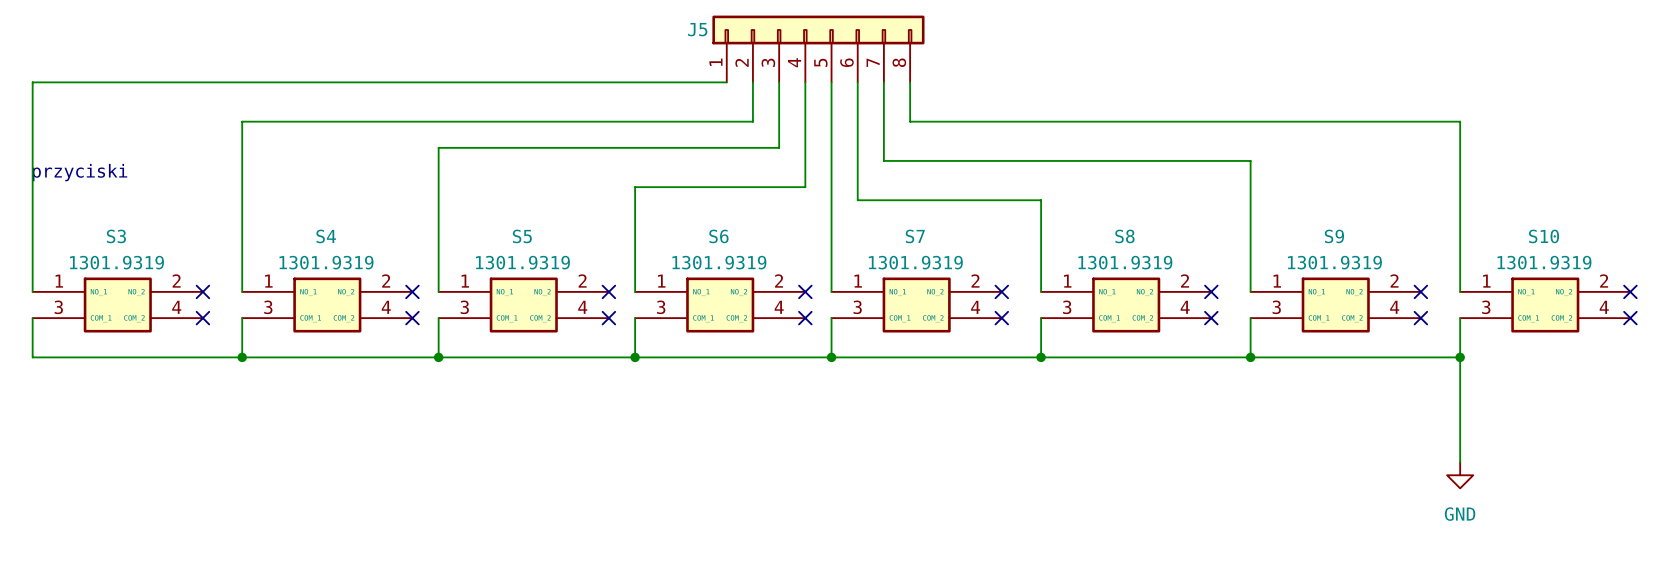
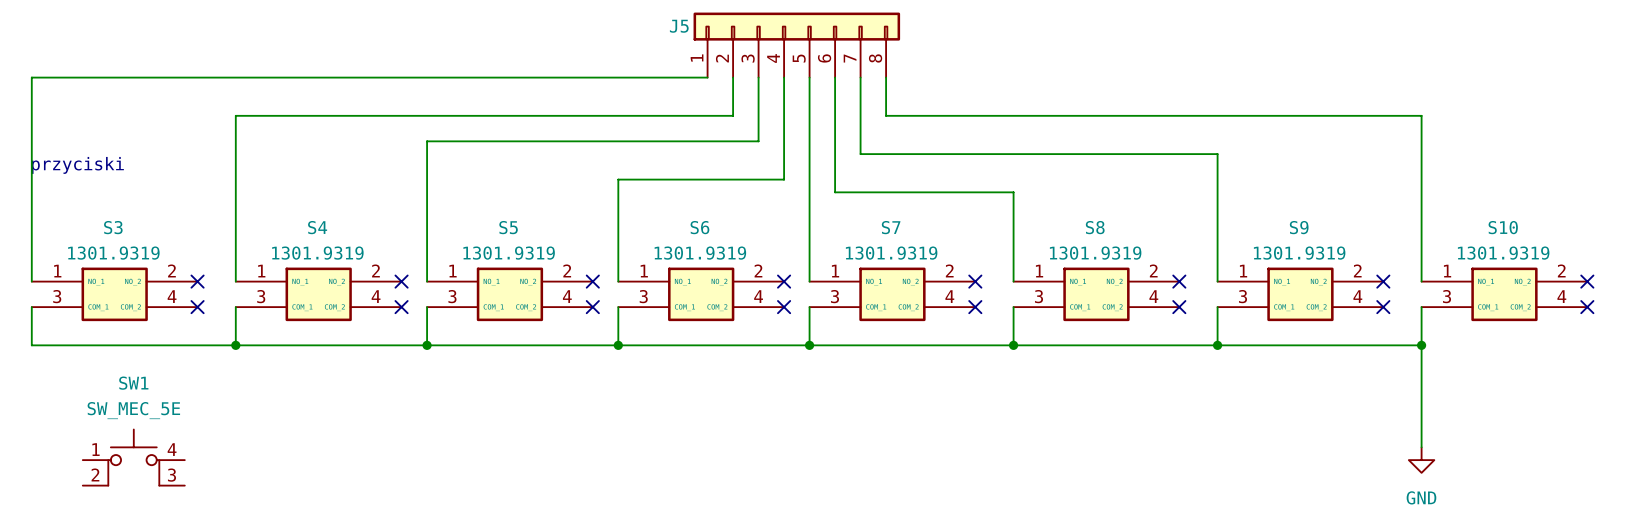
SW1: none -> SW_MEC_5E (133, 457)

